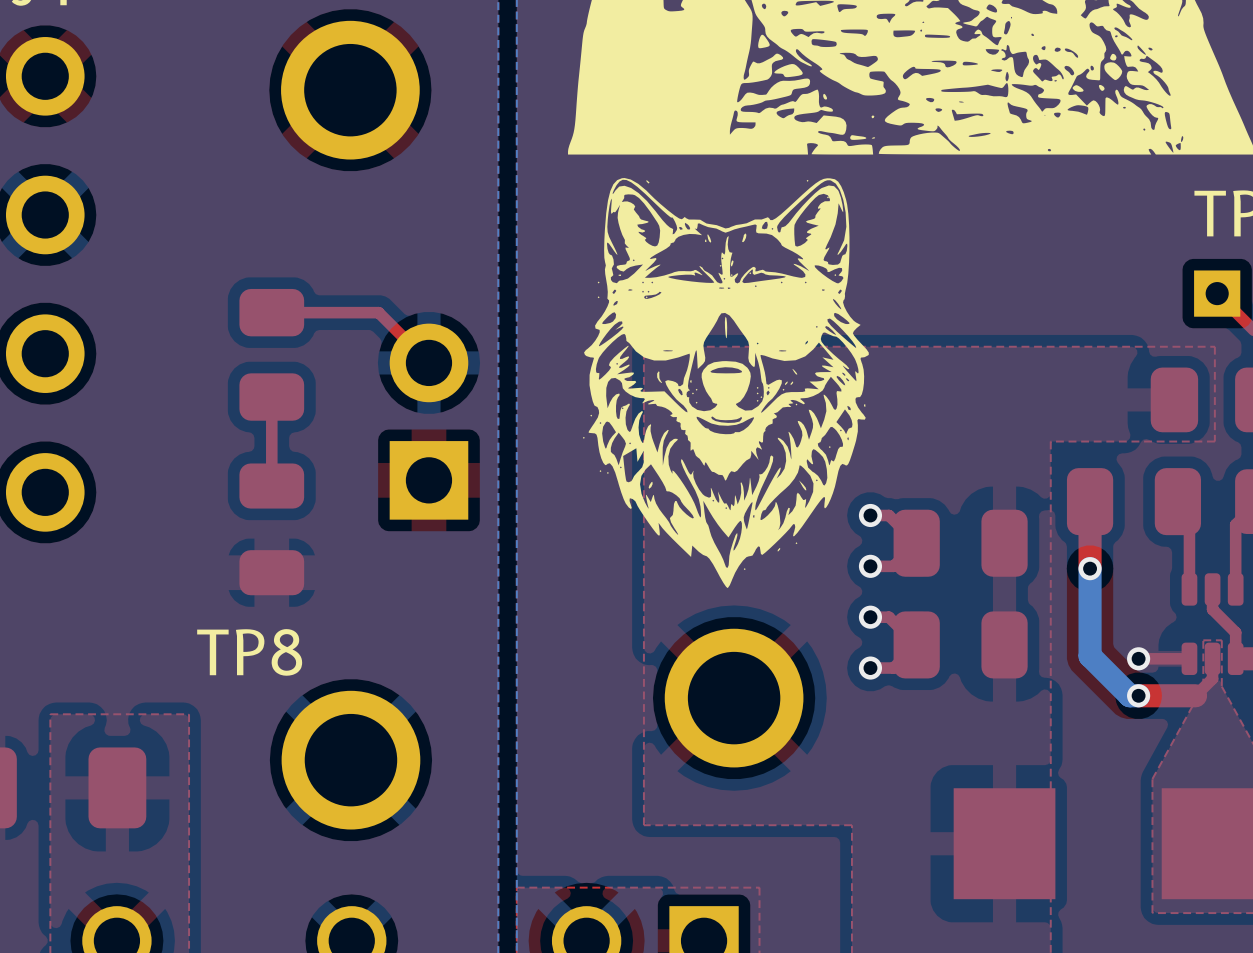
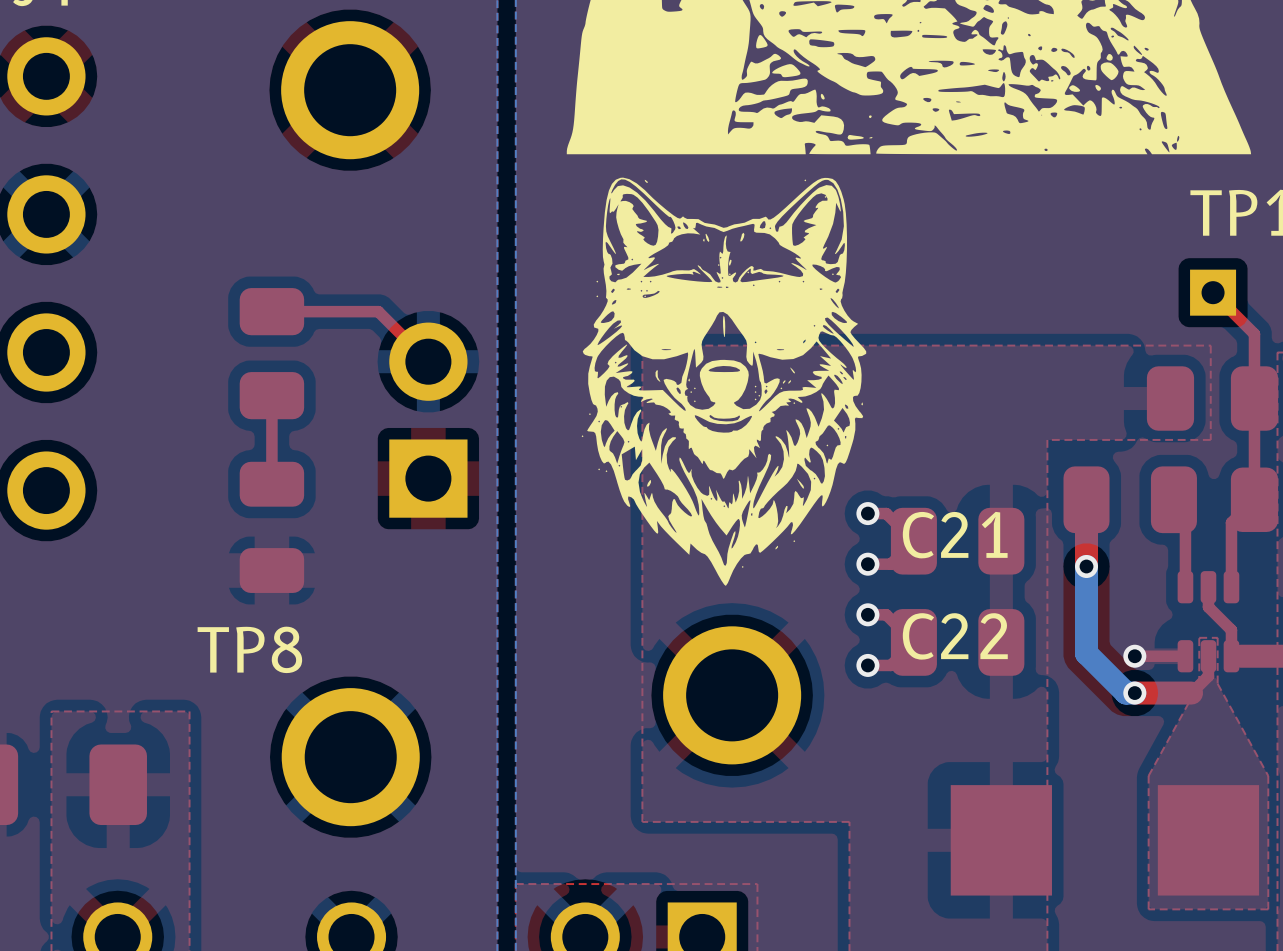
C21 name: none -> C21 (955, 535)
C22 name: none -> C22 (955, 636)

